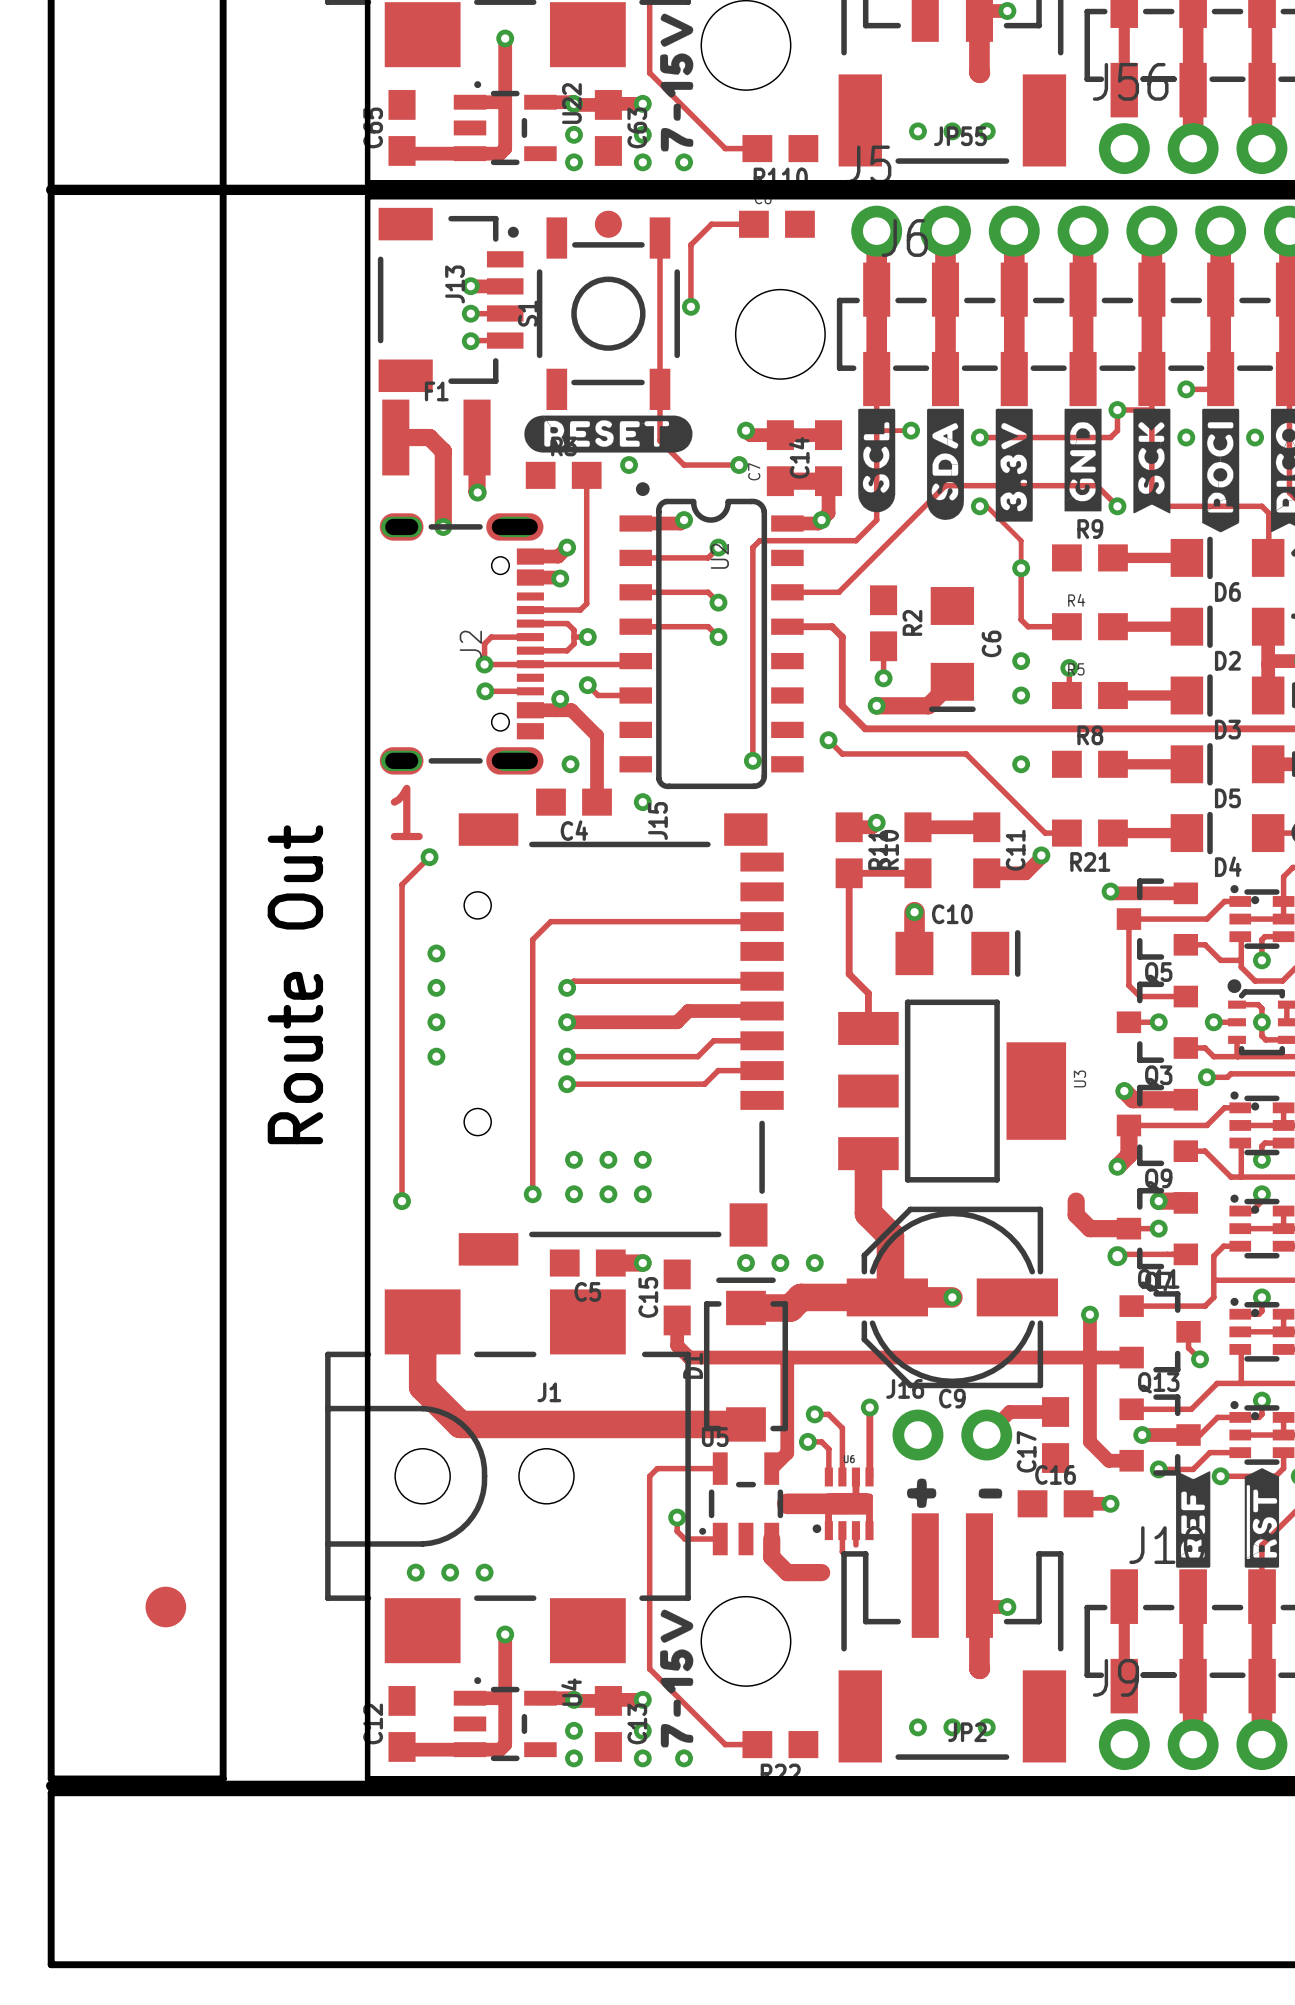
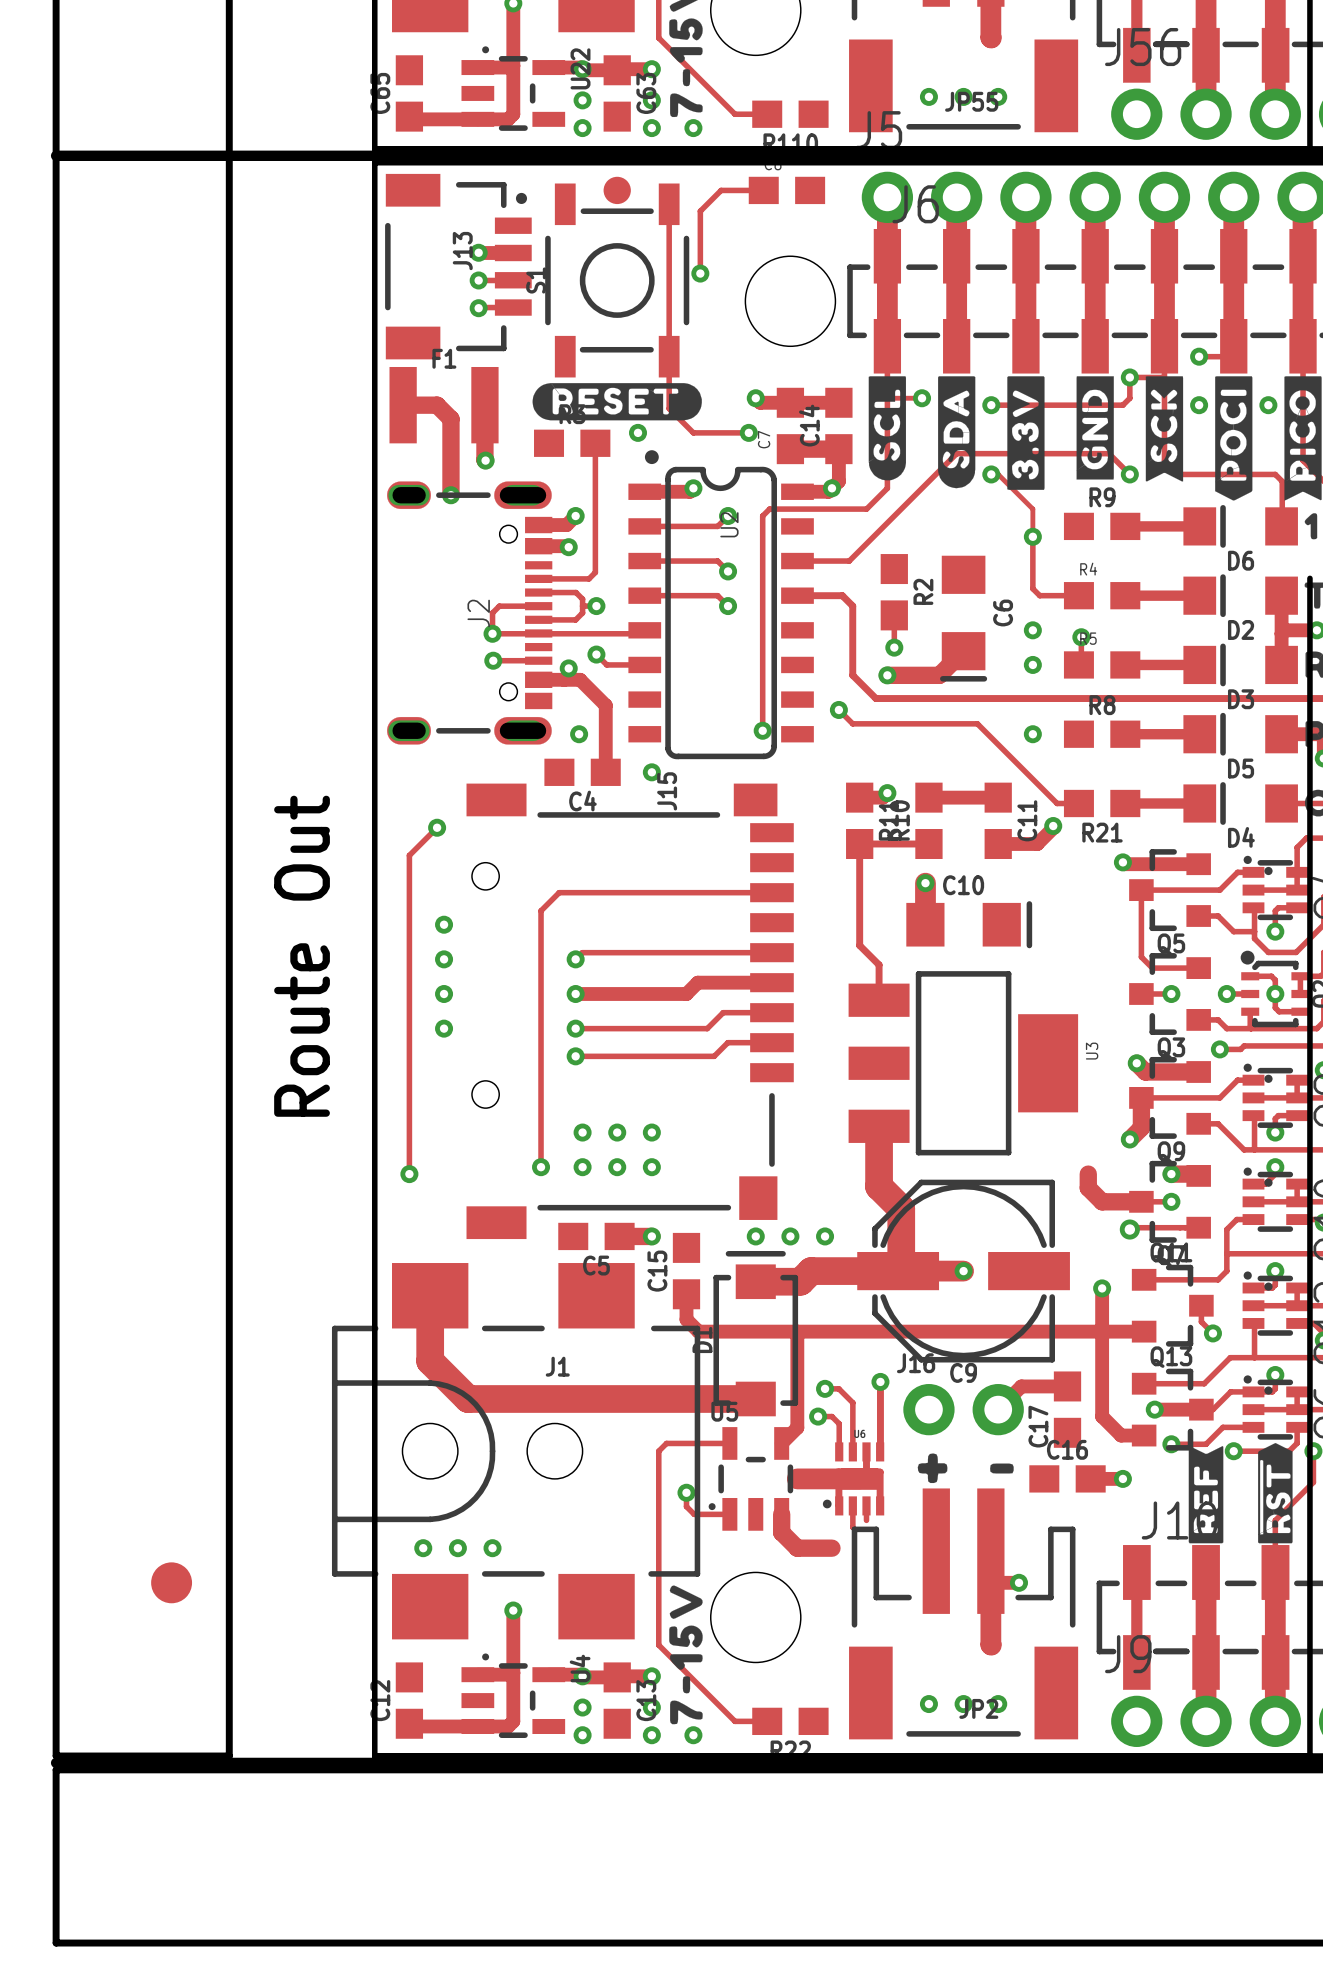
text: 1 (406, 812) -> none

